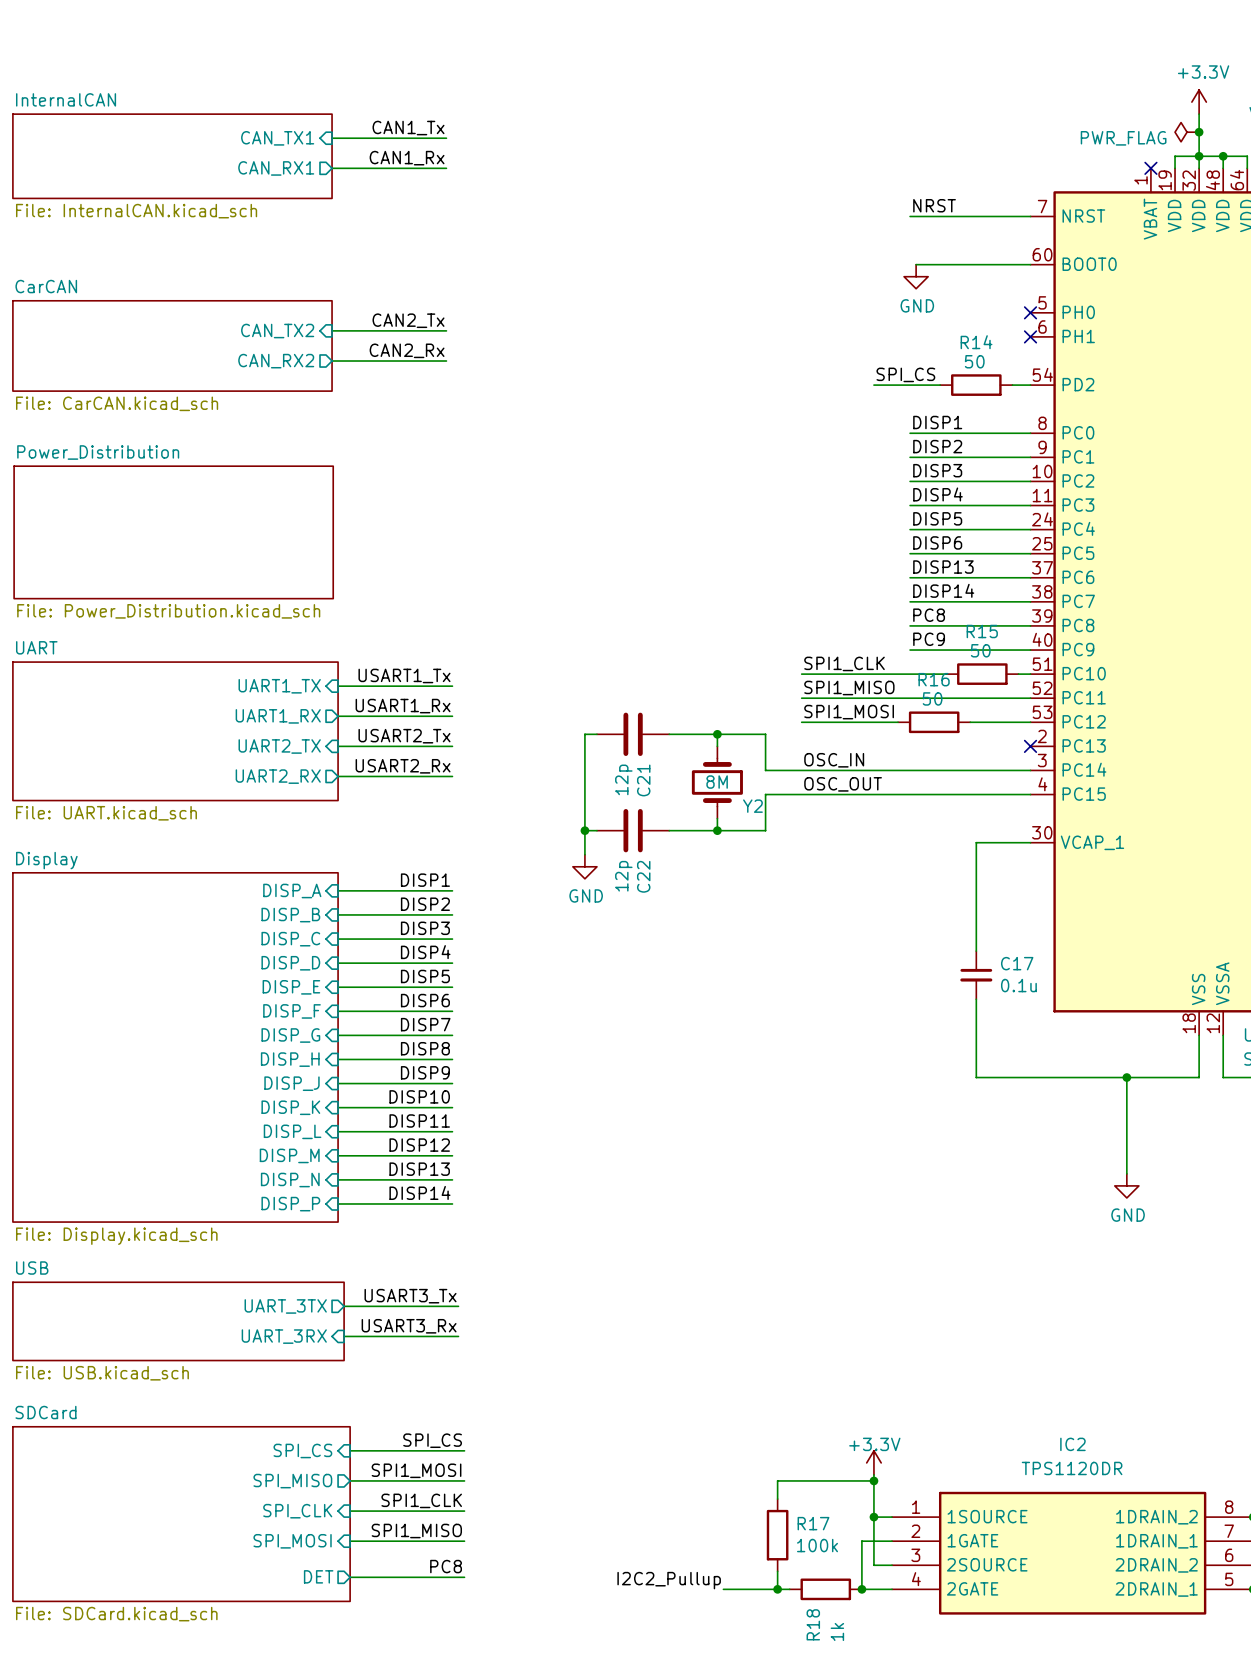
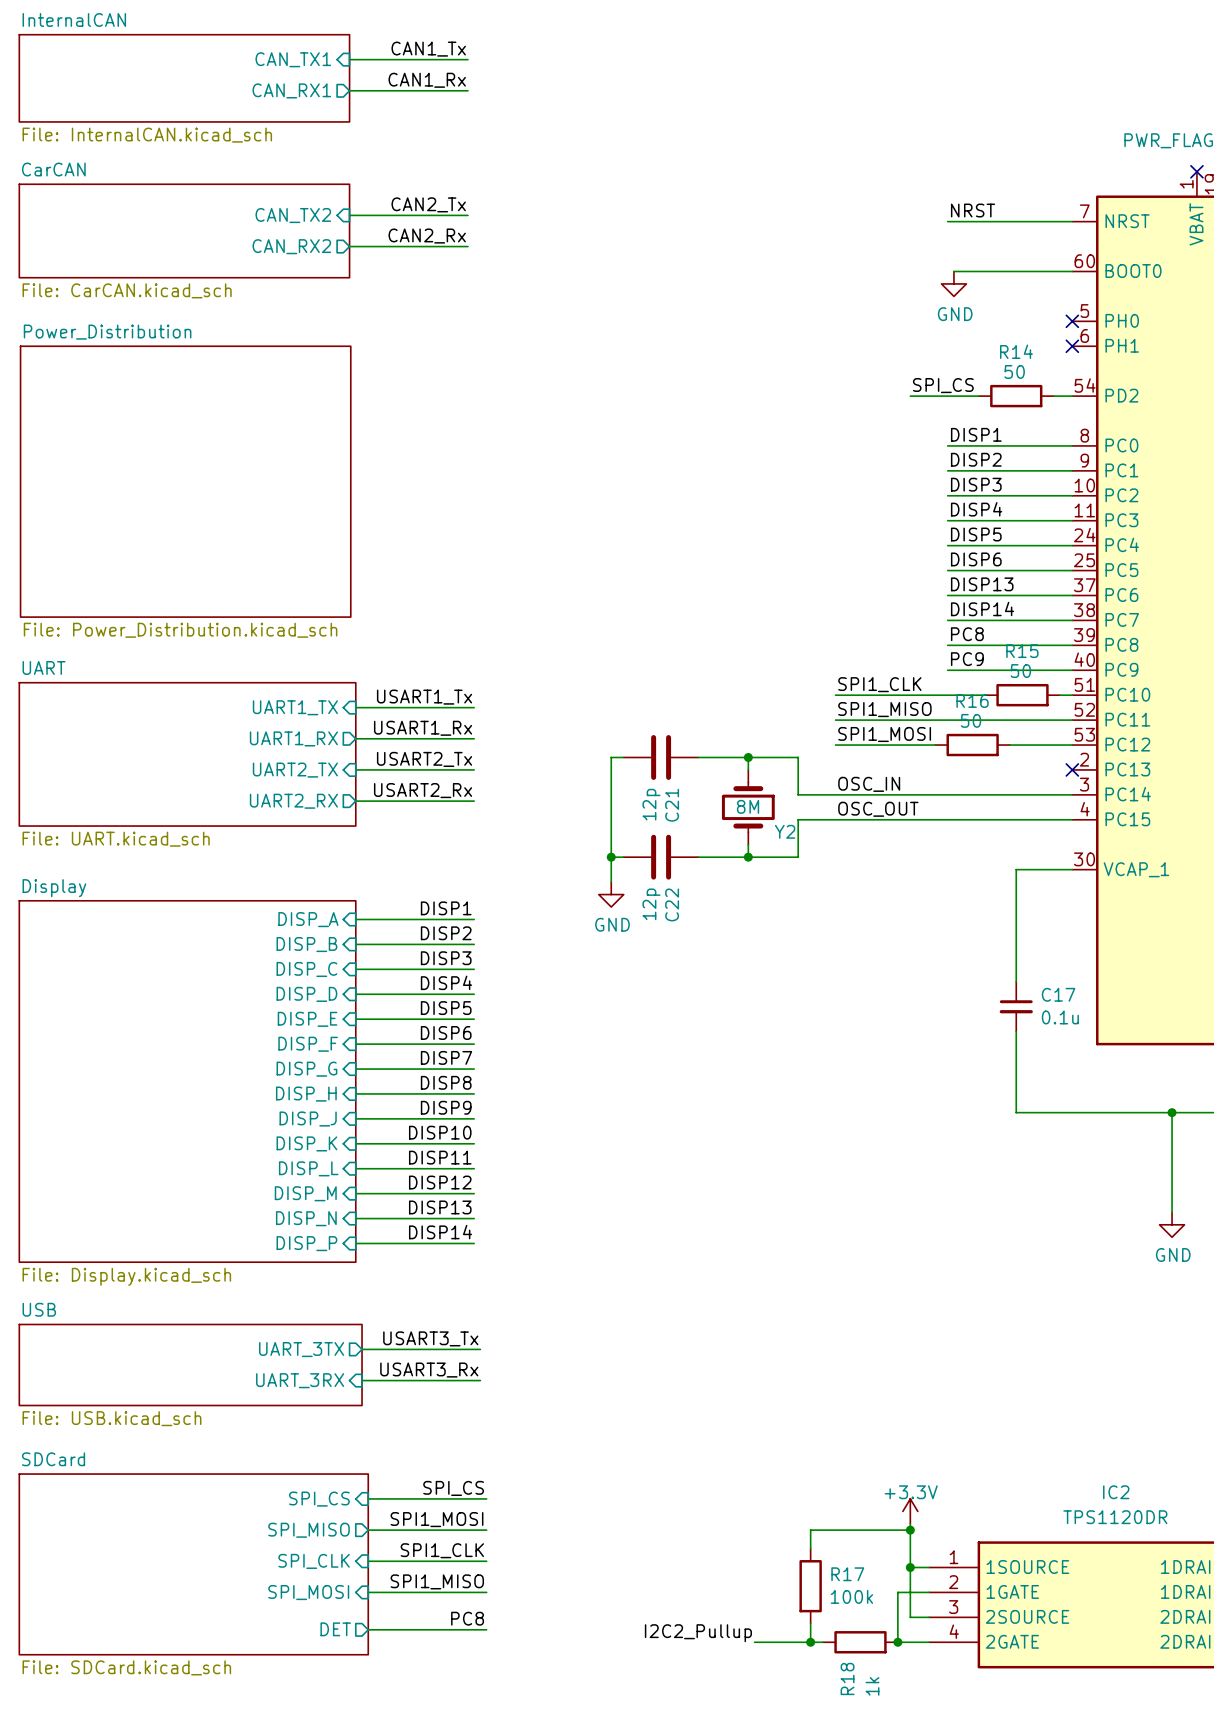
wire: none -> (349, 59) (467, 59)
wire: none -> (349, 90) (467, 90)
label position: CAN1_Tx (408, 128) -> CAN1_Tx (428, 49)
sheet pin position: CAN_TX1 (277, 138) -> CAN_TX1 (293, 59)
wire: (332, 138) (446, 138) -> (349, 215) (467, 215)
sheet InternalCAN position: (172, 156) -> (184, 78)
label position: CAN1_Rx (407, 158) -> CAN1_Rx (427, 80)
sheet pin position: CAN_RX1 (276, 168) -> CAN_RX1 (291, 90)
wire: (332, 168) (446, 168) -> (349, 246) (467, 246)
label position: CAN2_Tx (408, 320) -> CAN2_Tx (428, 204)
wire: (332, 330) (446, 330) -> none
sheet pin position: CAN_TX2 (277, 331) -> CAN_TX2 (293, 215)
sheet CarCAN position: (172, 345) -> (184, 230)
label position: CAN2_Rx (407, 350) -> CAN2_Rx (427, 236)
sheet pin position: CAN_RX2 (276, 361) -> CAN_RX2 (291, 246)
wire: (332, 361) (446, 361) -> none
sheet Power_Distribution: none -> File: Power_Distribution.kicad_sch (185, 481)
sheet Power_Distribution: File: Power_Distribution.kicad_sch (173, 532) -> none

